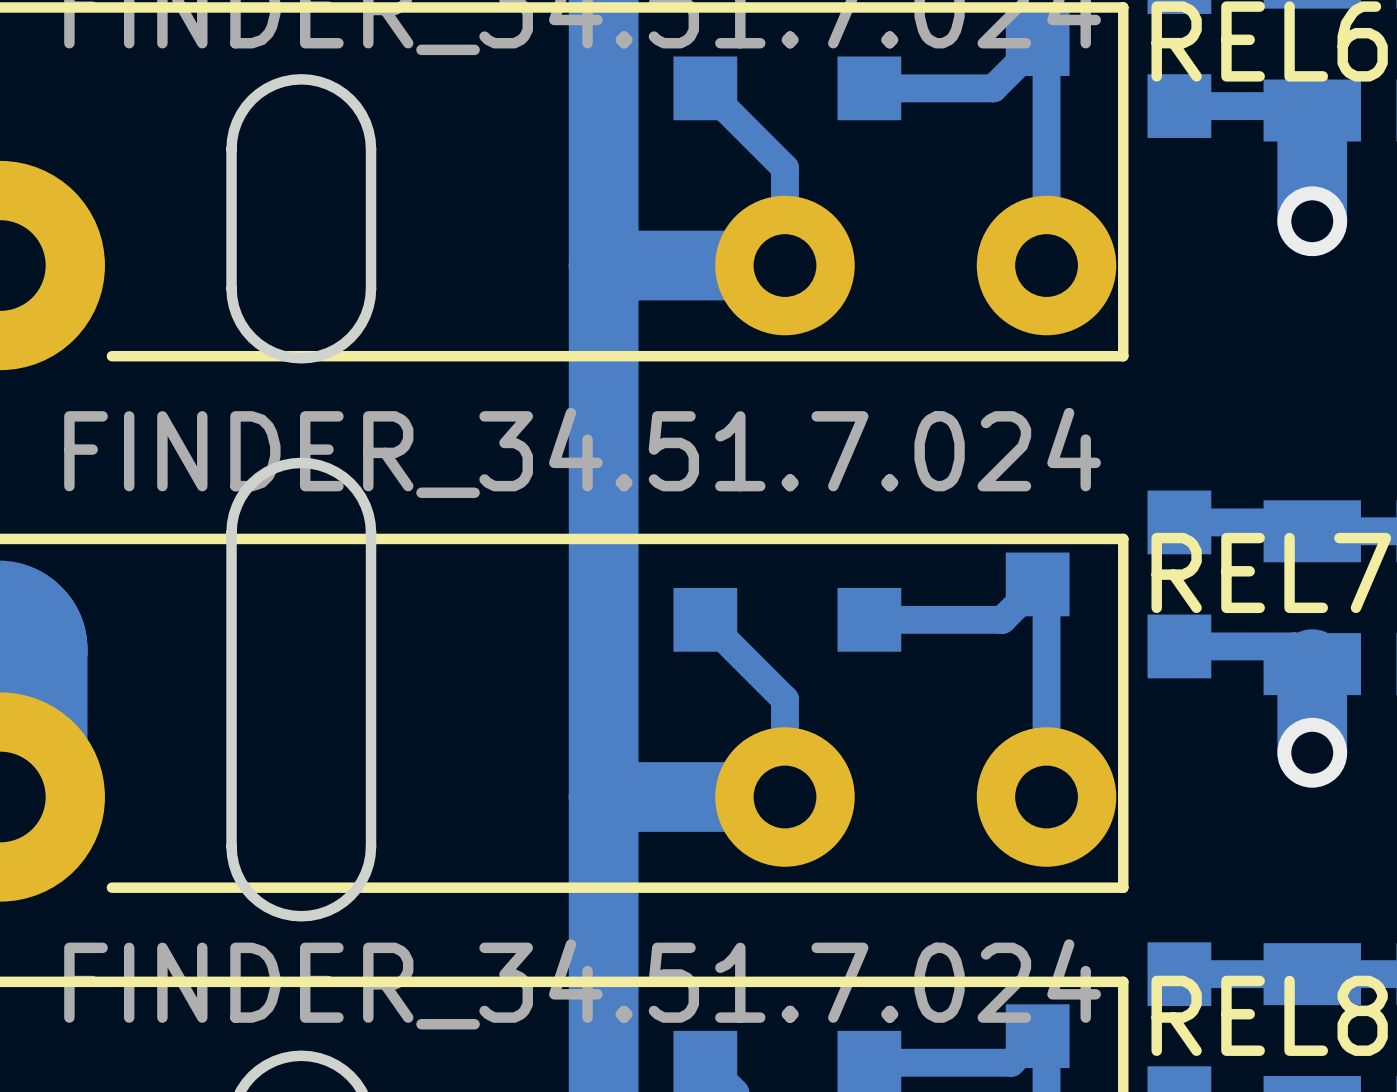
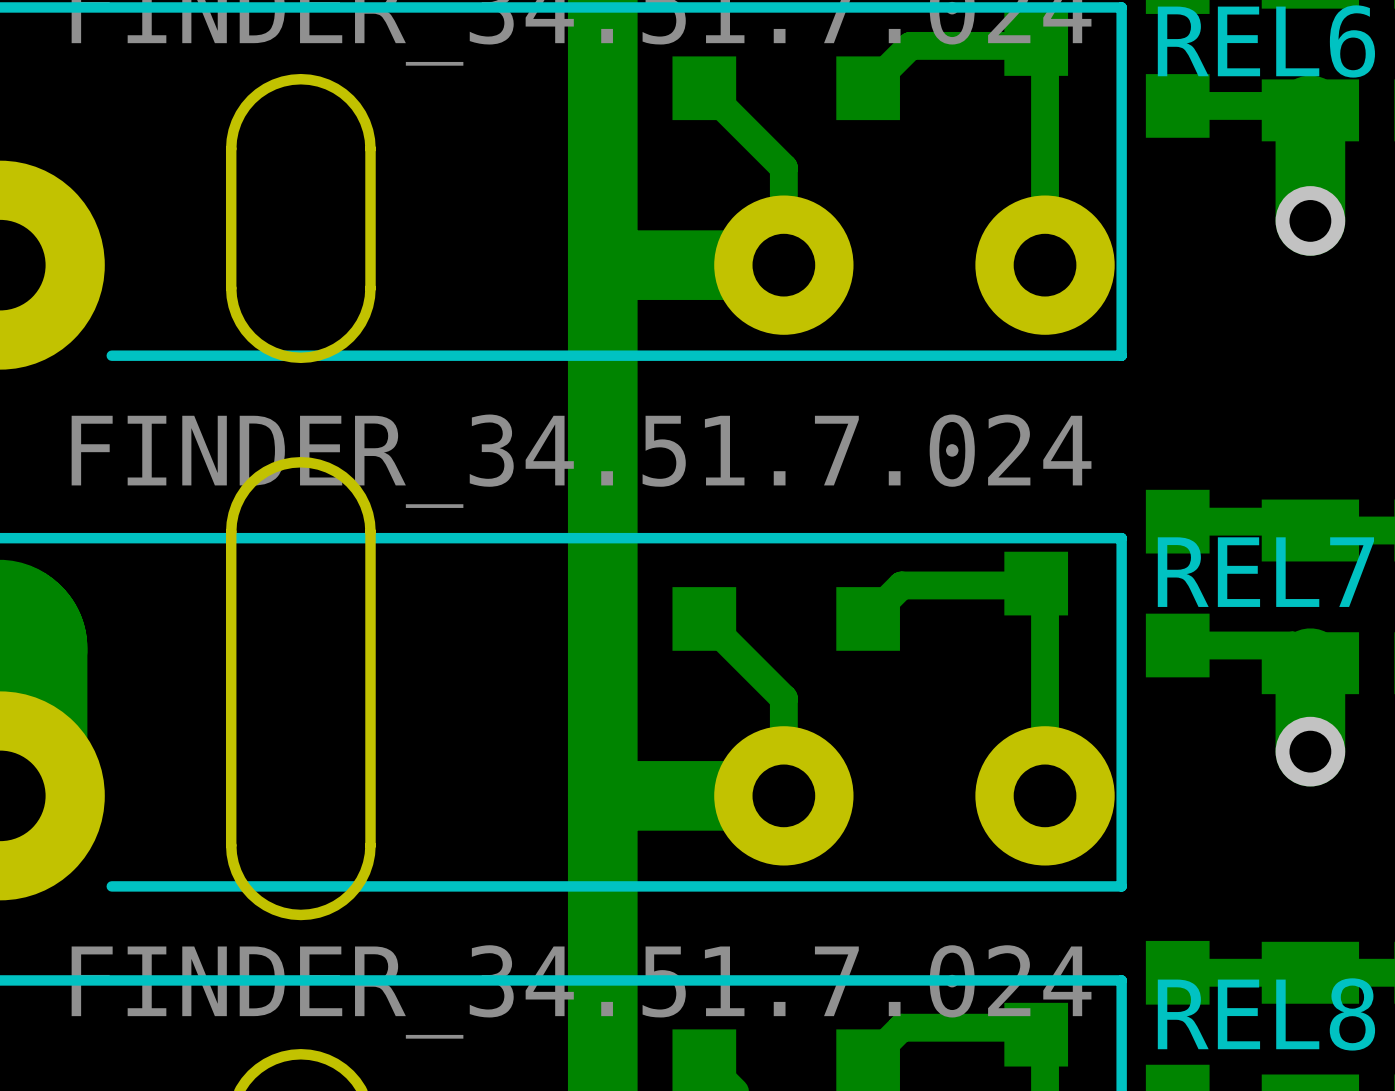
bottom track: (1035, 45) (993, 88) (869, 88) -> (1034, 45) (910, 45) (868, 88)
bottom track: (1035, 586) (1002, 619) (869, 619) -> (1034, 585) (901, 585) (868, 618)
bottom track: (1037, 1036) (1011, 1062) (869, 1062) -> (1036, 1034) (1029, 1027) (901, 1027) (868, 1061)

